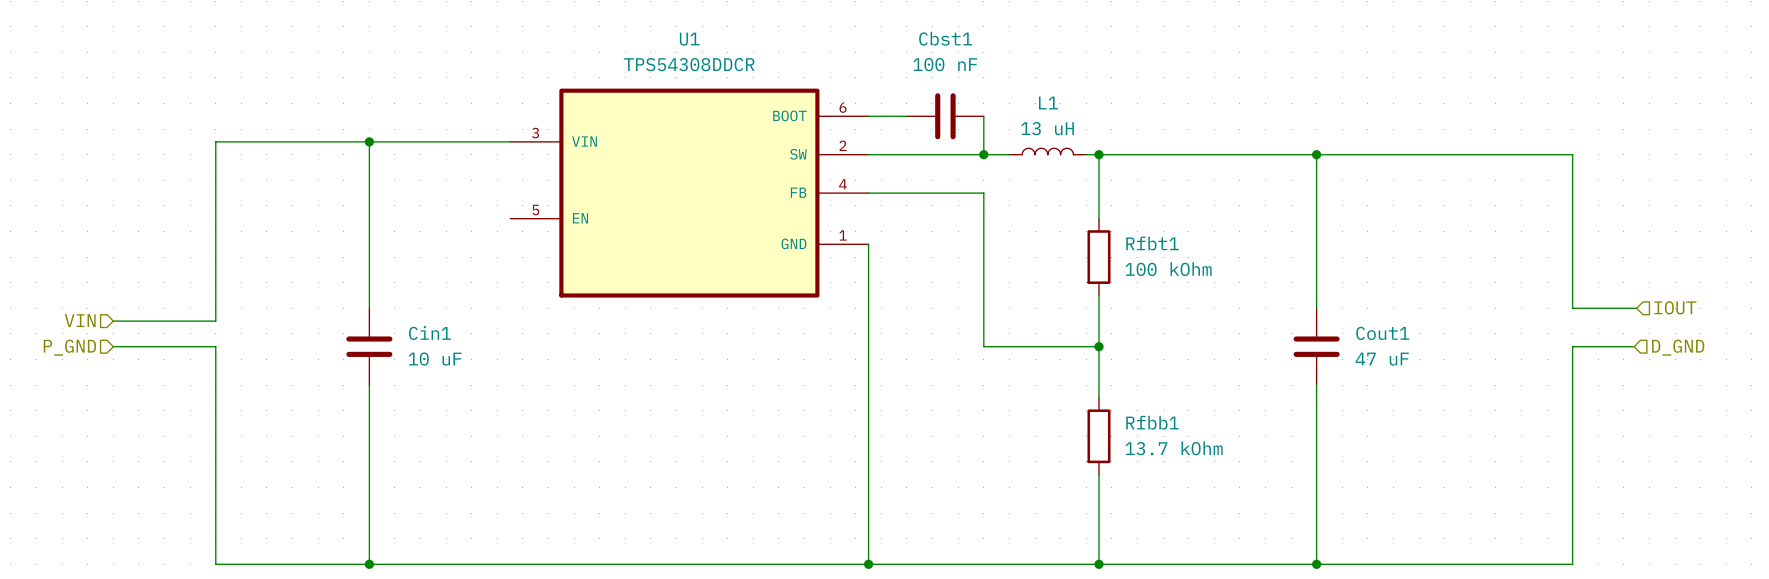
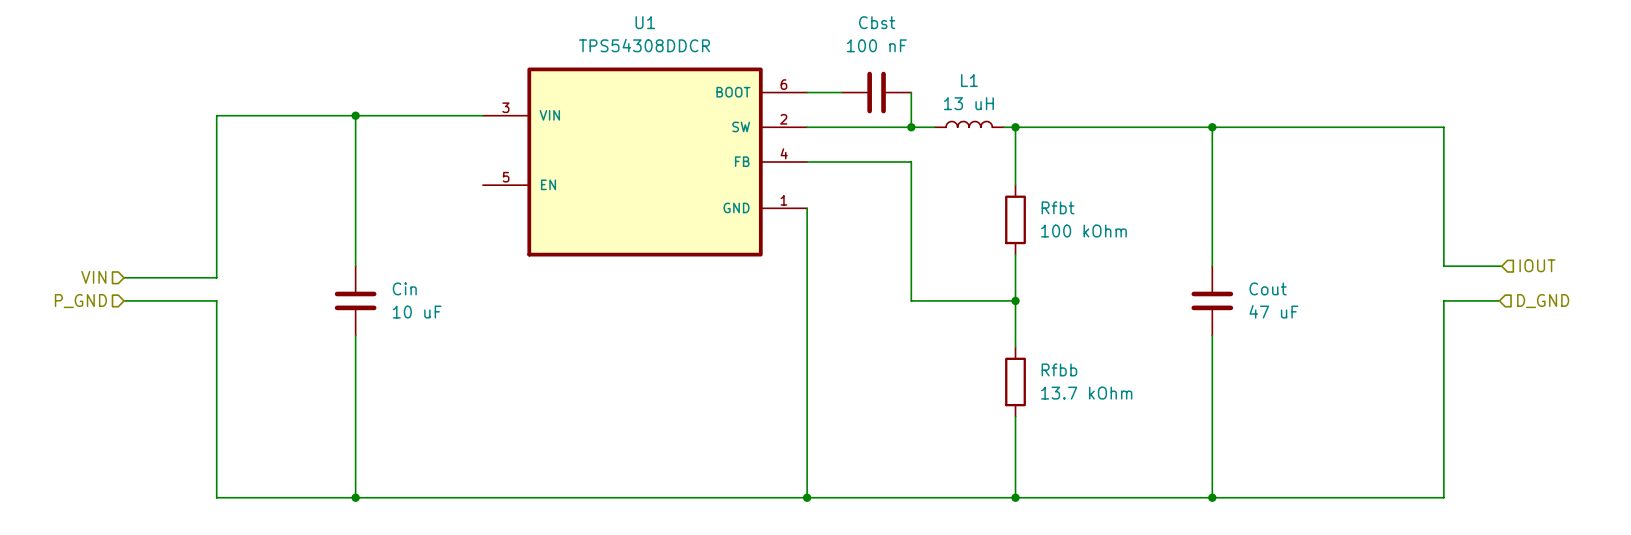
Cbst1 name: Cbst1 (945, 38) -> Cbst (877, 22)
Rfbt1 name: Rfbt1 (1152, 243) -> Rfbt (1058, 207)
Cin1 name: Cin1 (429, 333) -> Cin (404, 288)
Cout1 name: Cout1 (1382, 333) -> Cout (1268, 288)
Rfbb1 name: Rfbb1 (1152, 422) -> Rfbb (1059, 369)

